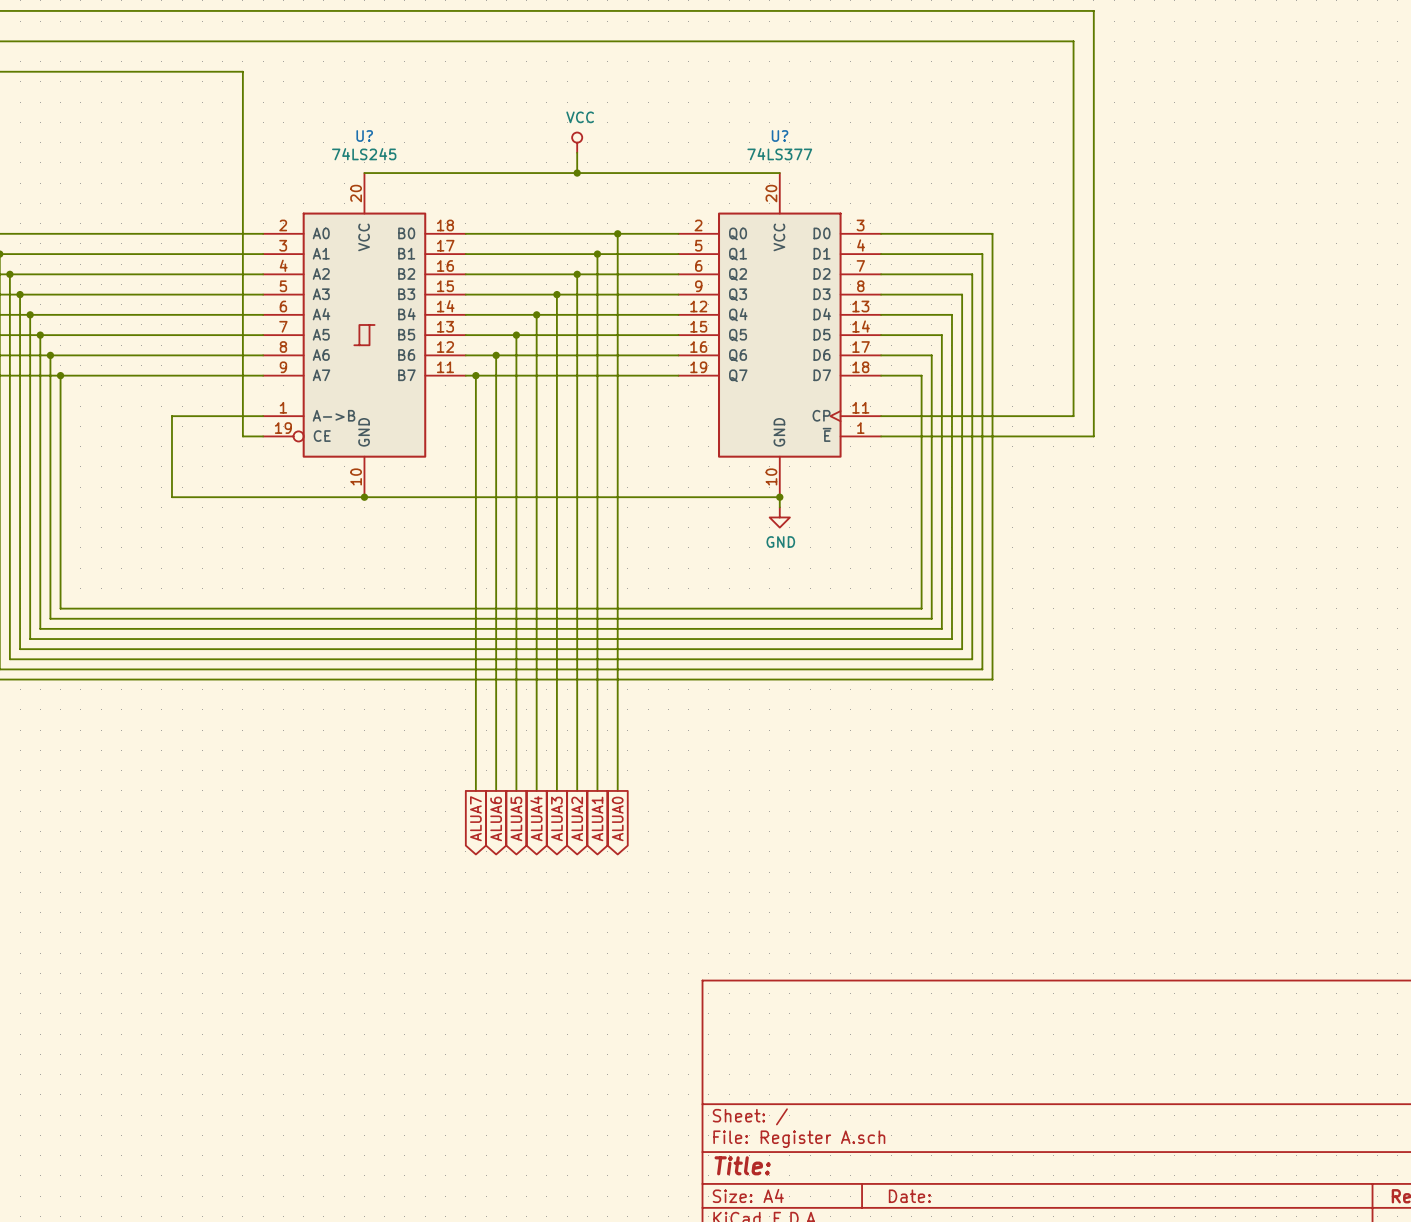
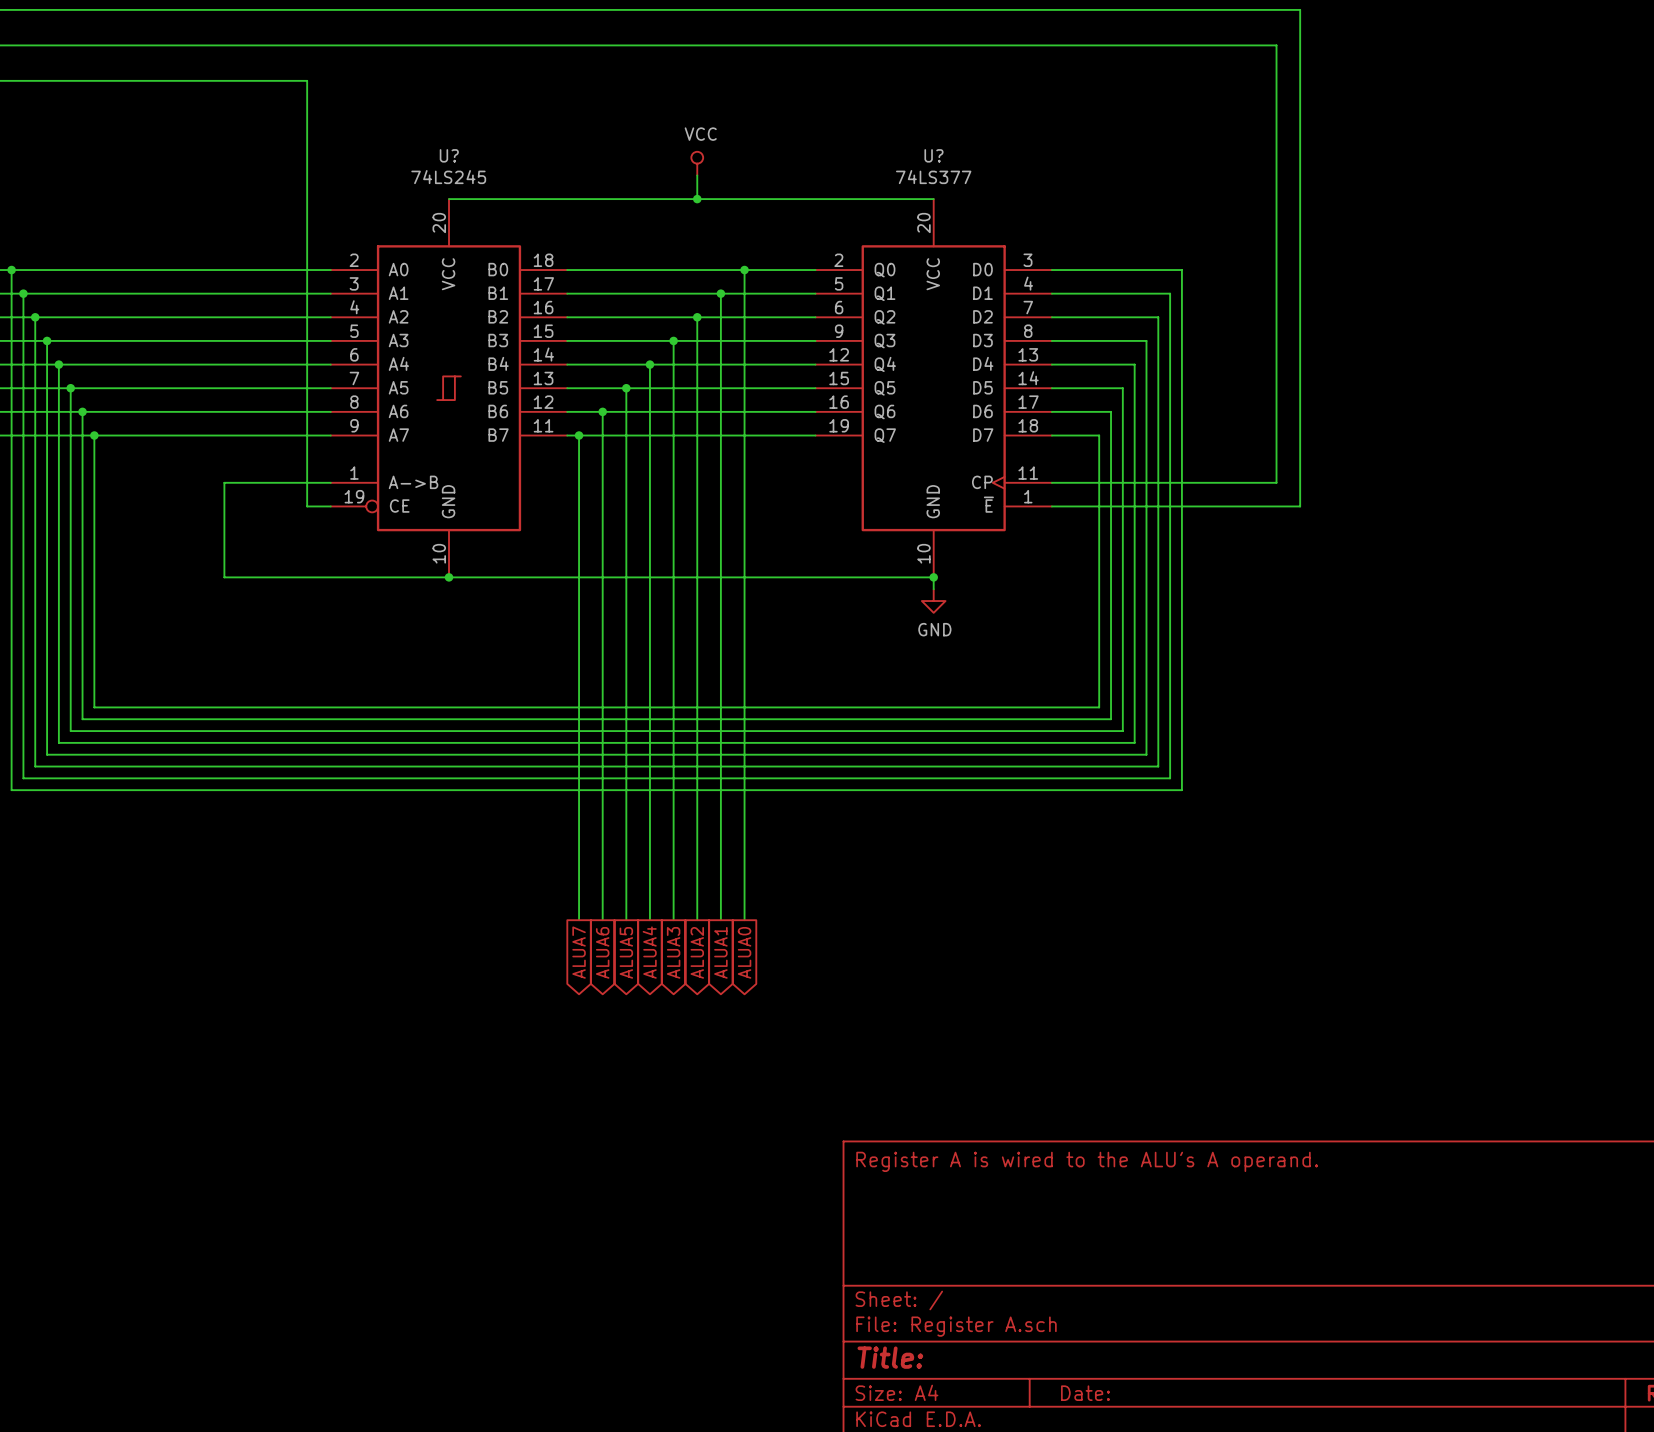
title block: none -> Register A is wired to the ALU's A operand. (1087, 1161)

